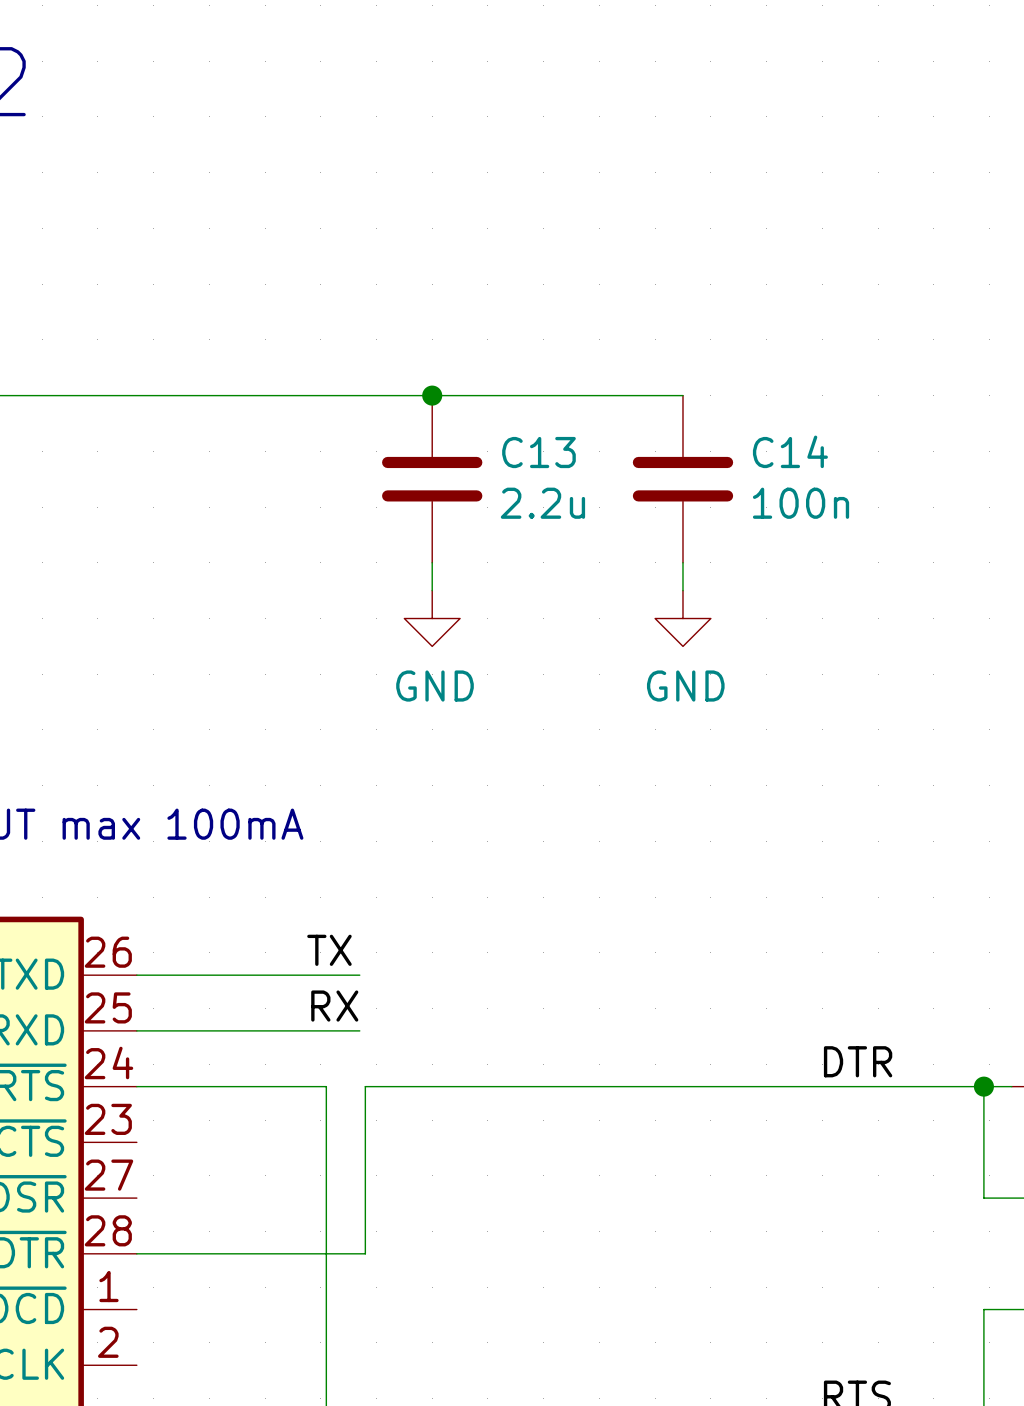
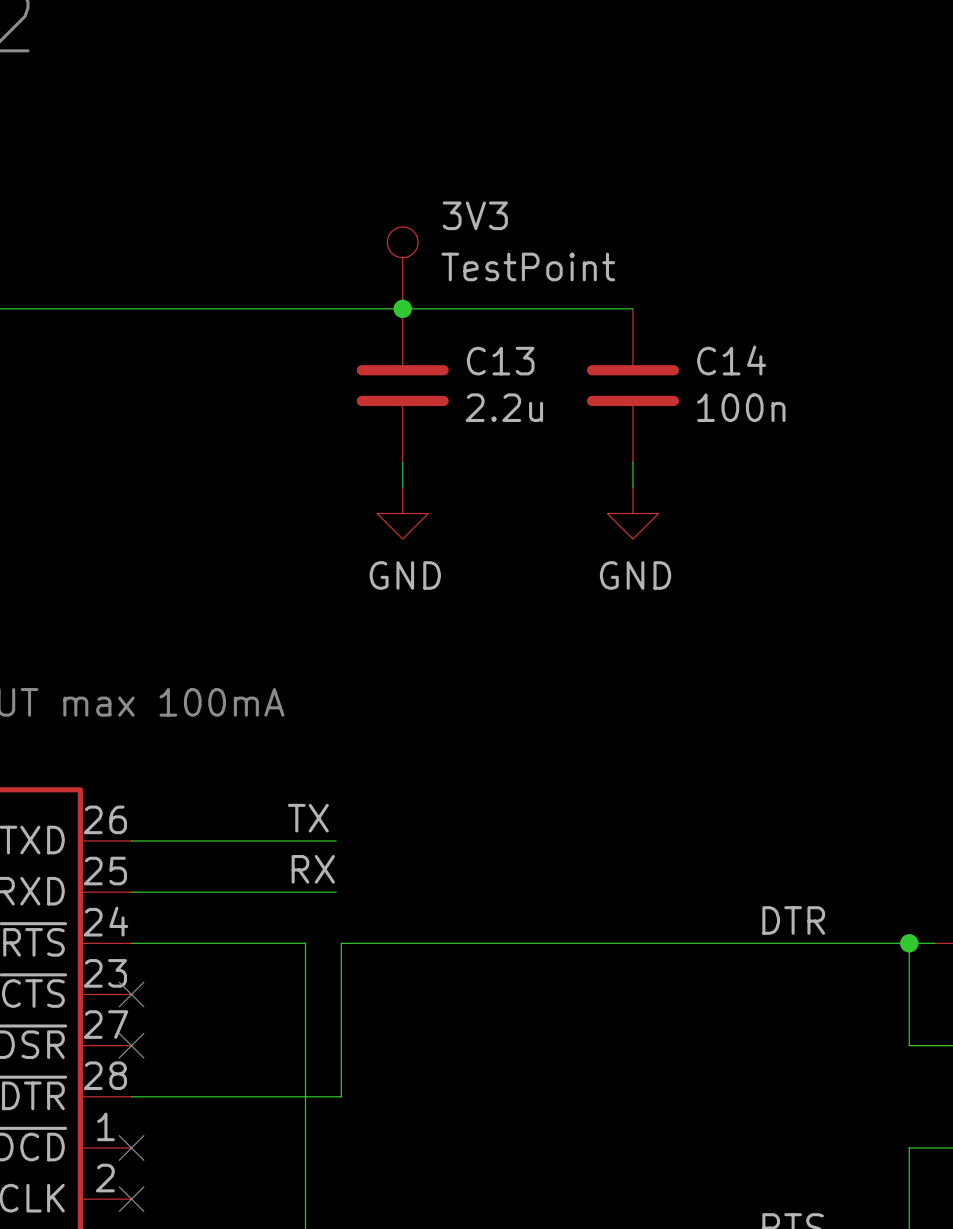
3V3: none -> TestPoint (402, 267)
no-connect mark: none -> (131, 994)
no-connect mark: none -> (131, 1045)
no-connect mark: none -> (131, 1147)
no-connect mark: none -> (131, 1199)

